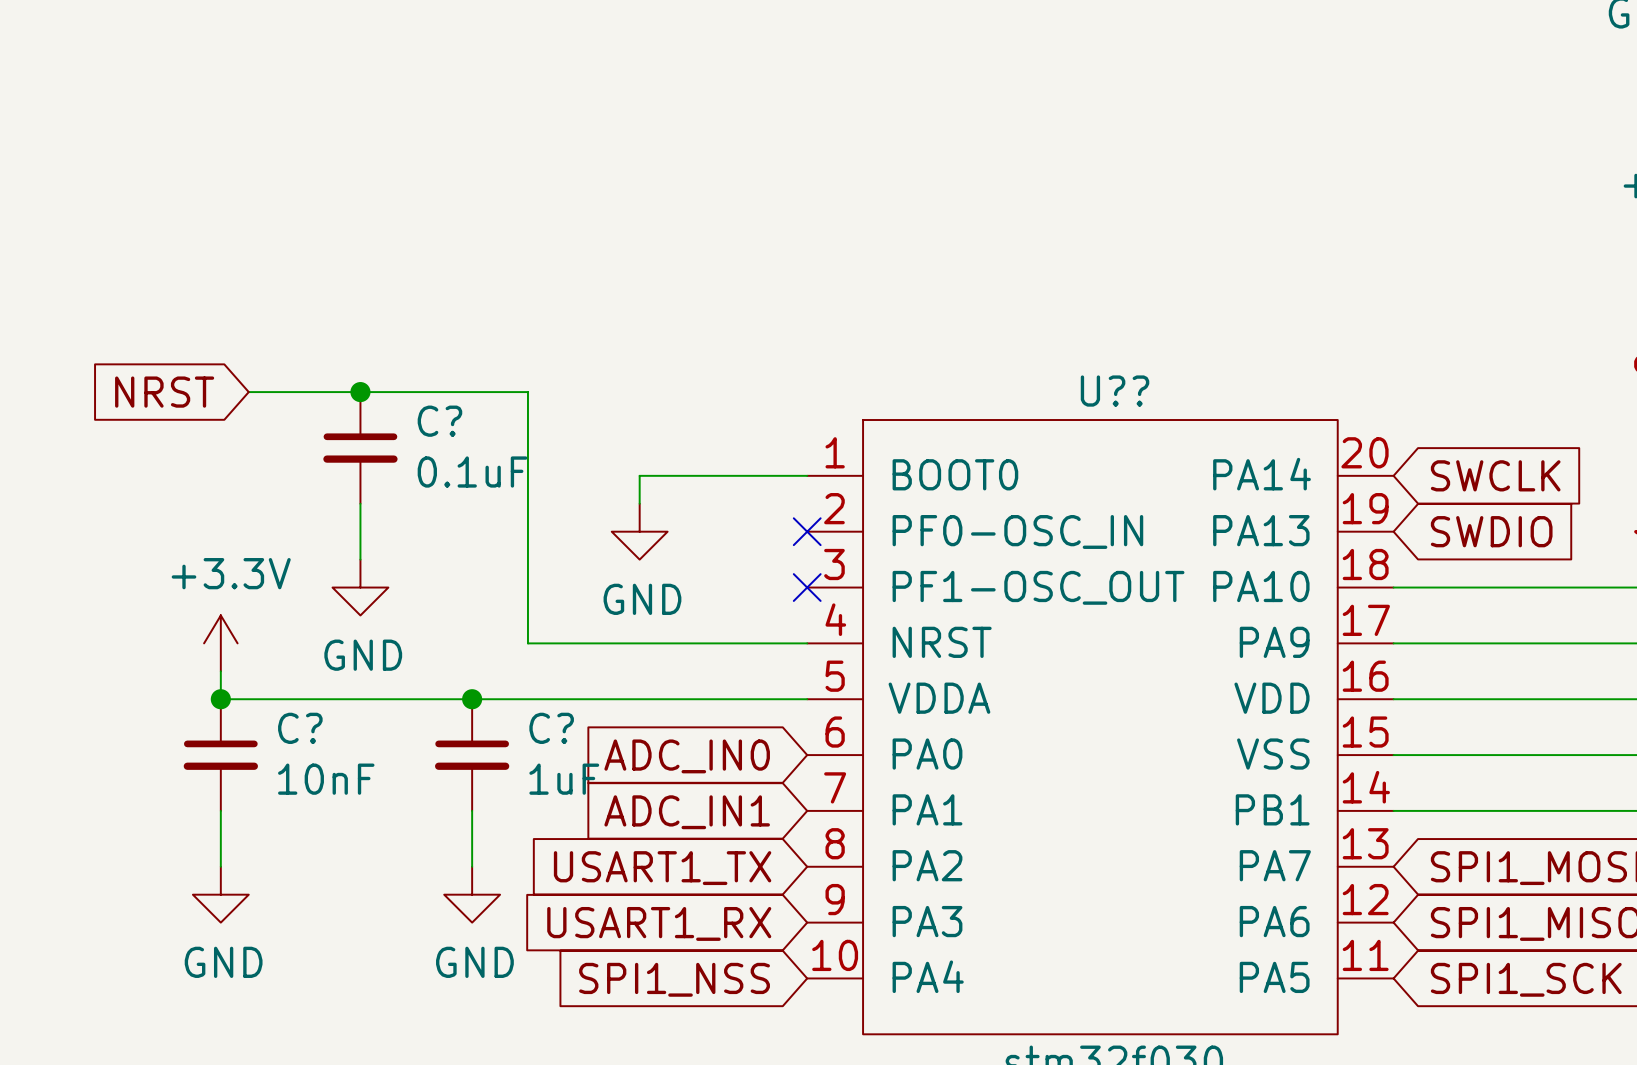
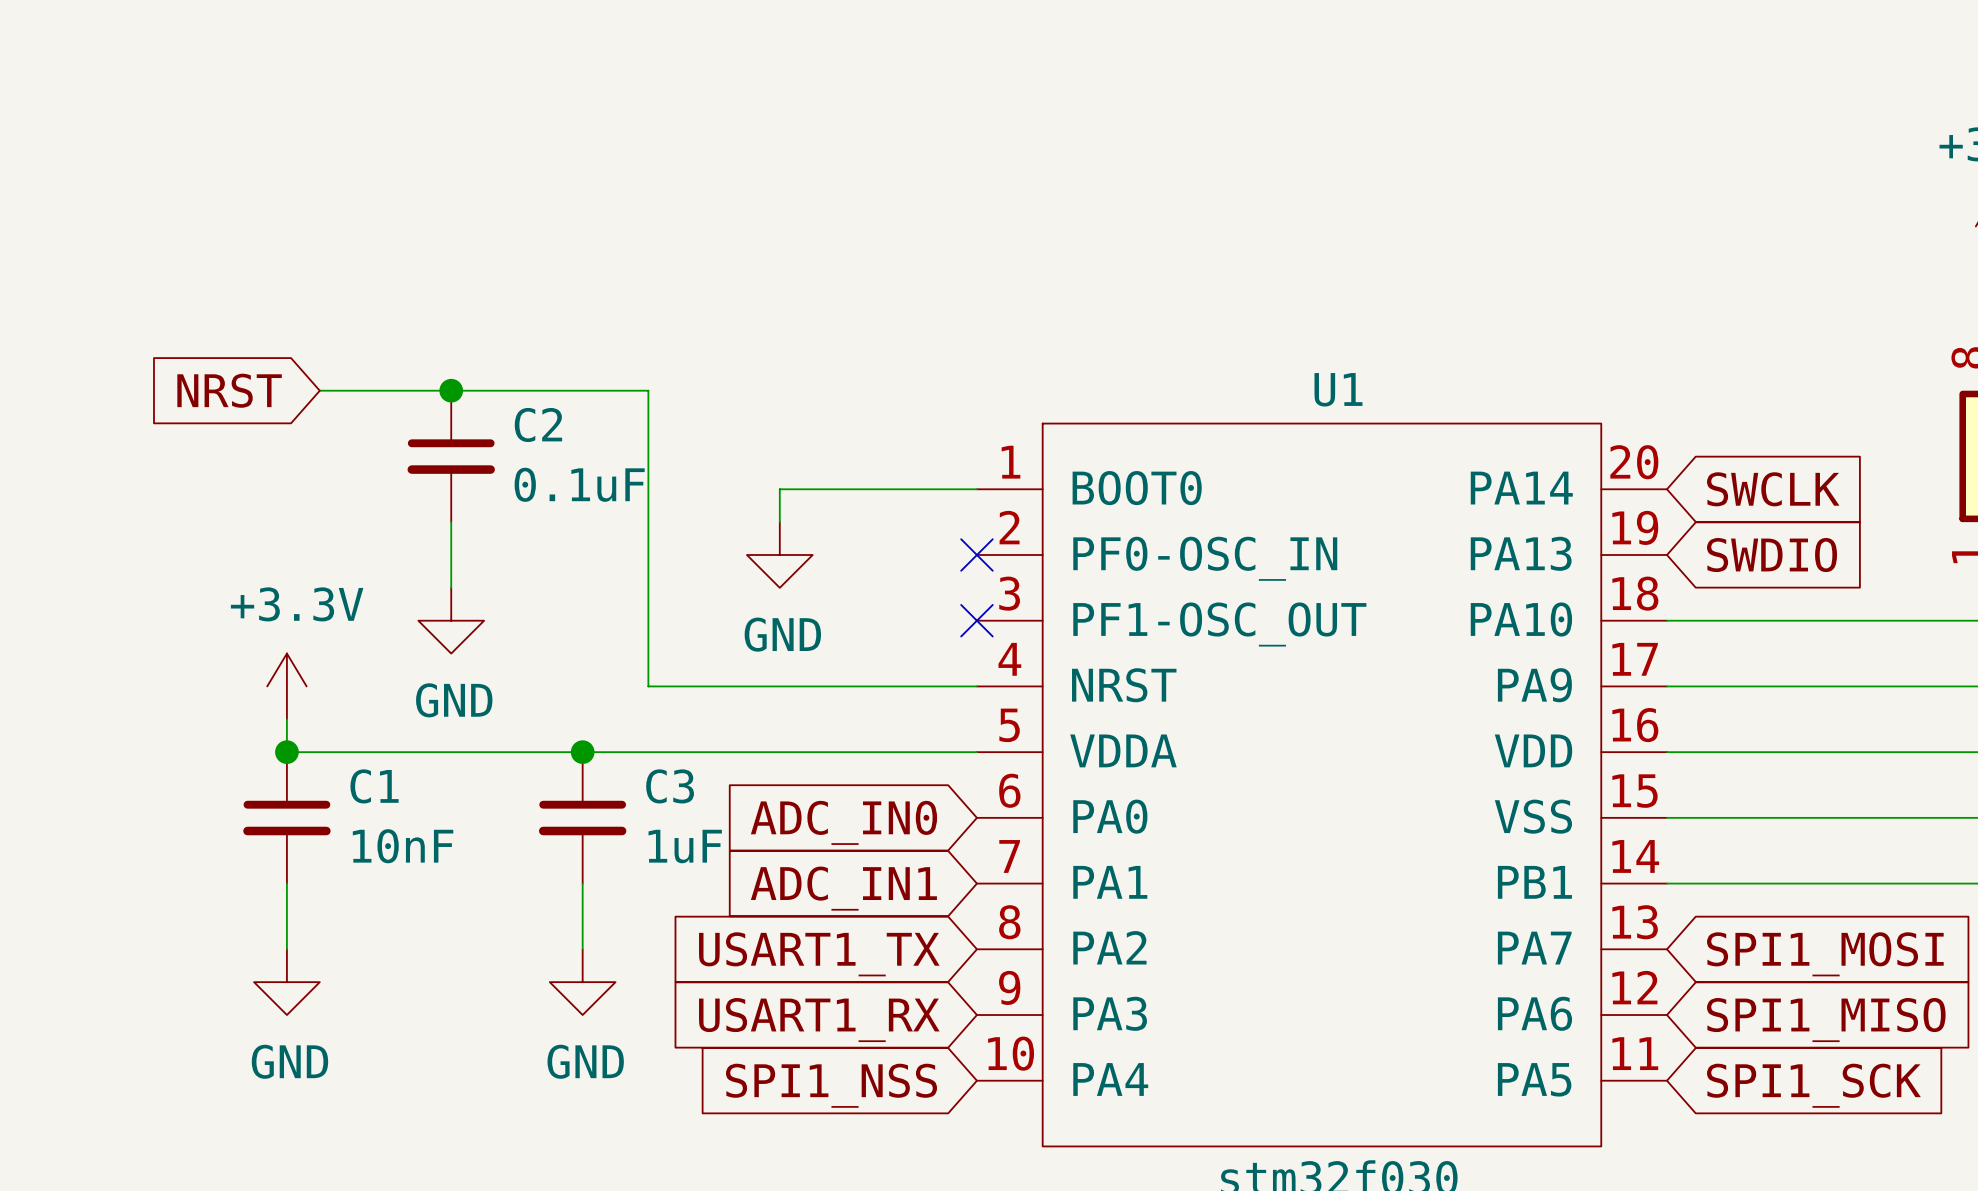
U?? name: U?? (1115, 391) -> U1 (1338, 389)
C? name: C? (439, 421) -> C2 (538, 424)
C? name: C? (300, 728) -> C1 (374, 786)
C? name: C? (551, 728) -> C3 (670, 786)

